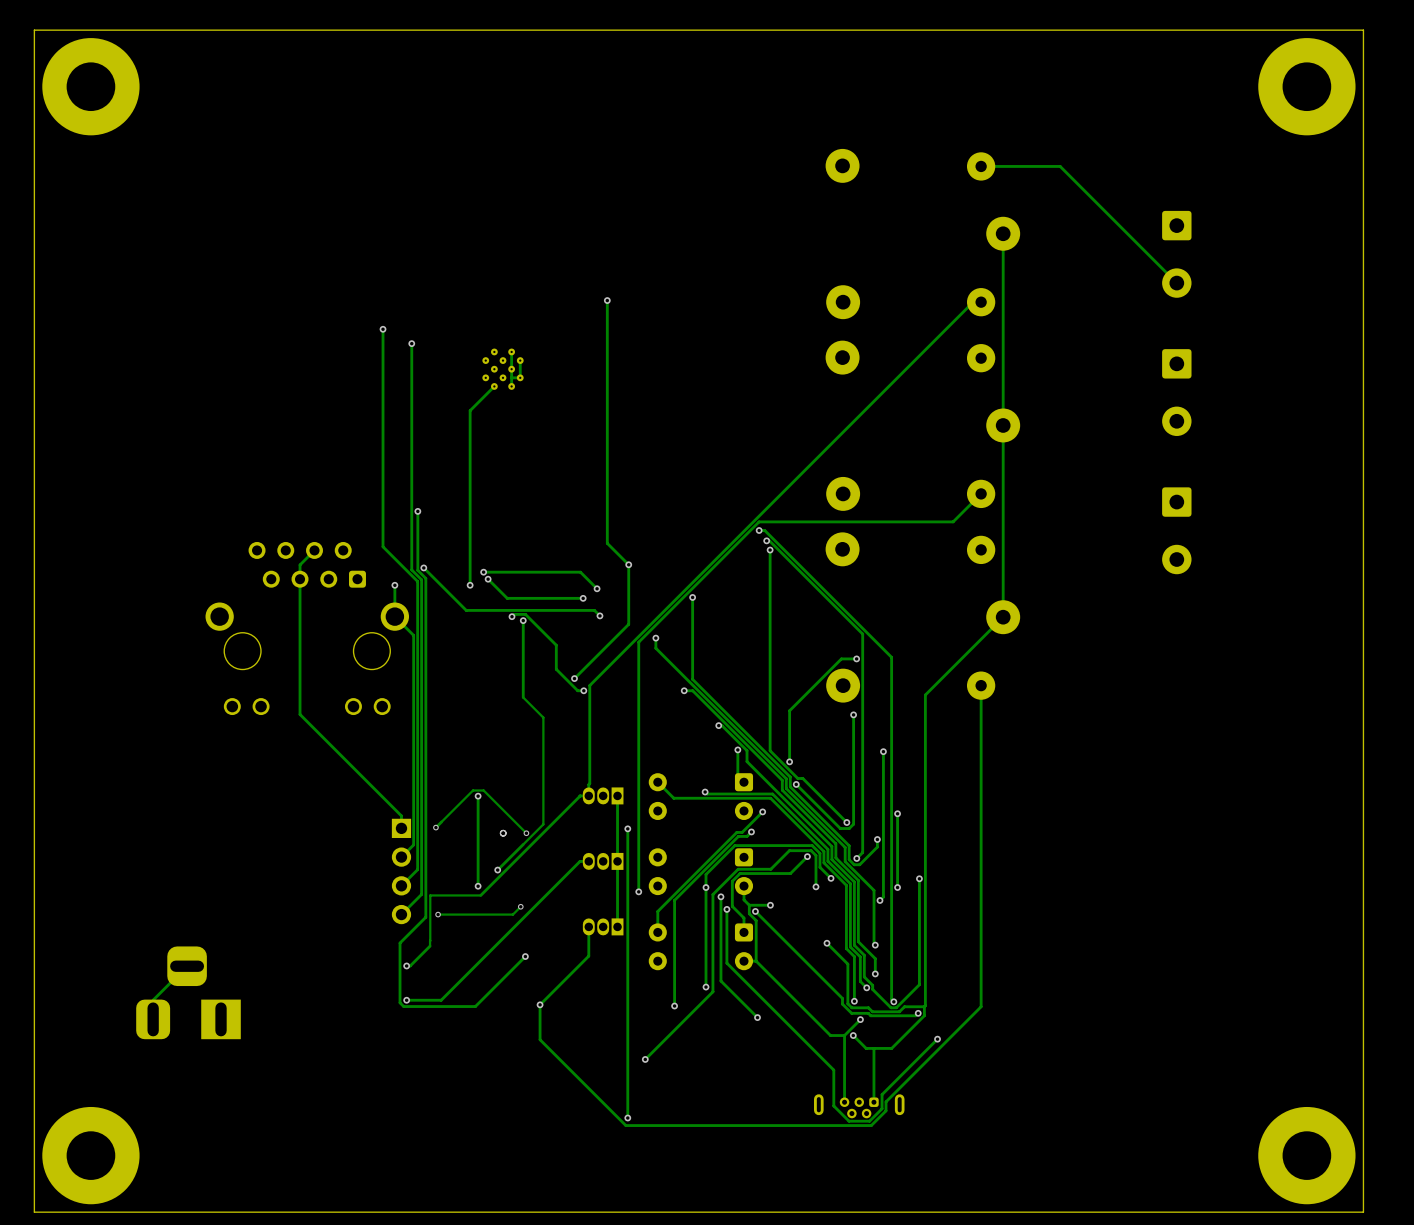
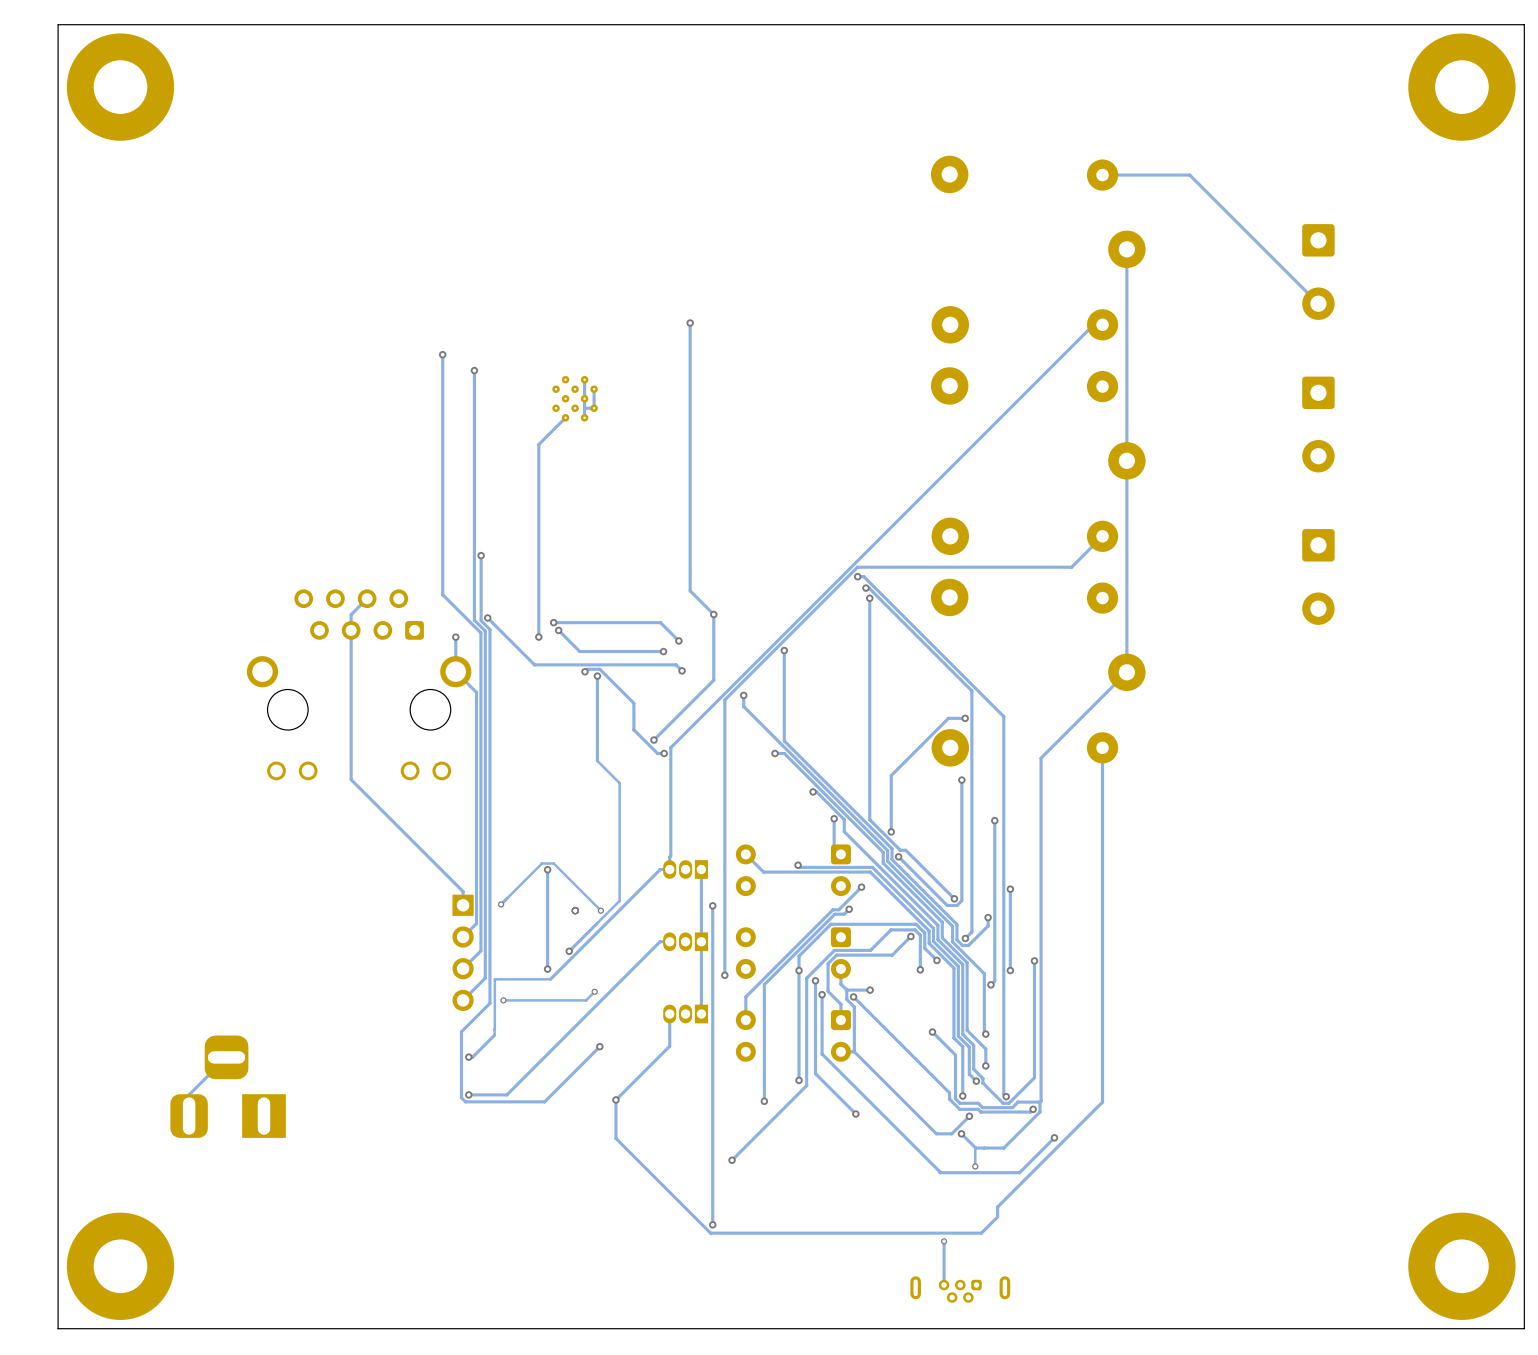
track: (844, 1035) (844, 1102) -> none
track: none -> (975, 1148) (975, 1166)
track: (873, 1048) (873, 1102) -> none
via: none -> (975, 1166)
track: (905, 1070) (882, 1094) (882, 1108) (869, 1121) (849, 1121) (833, 1105) (833, 1070) -> (1019, 1172) (940, 1172)
part position: (859, 1106) -> (960, 1289)
track: none -> (944, 1241) (944, 1285)
via: none -> (944, 1241)

